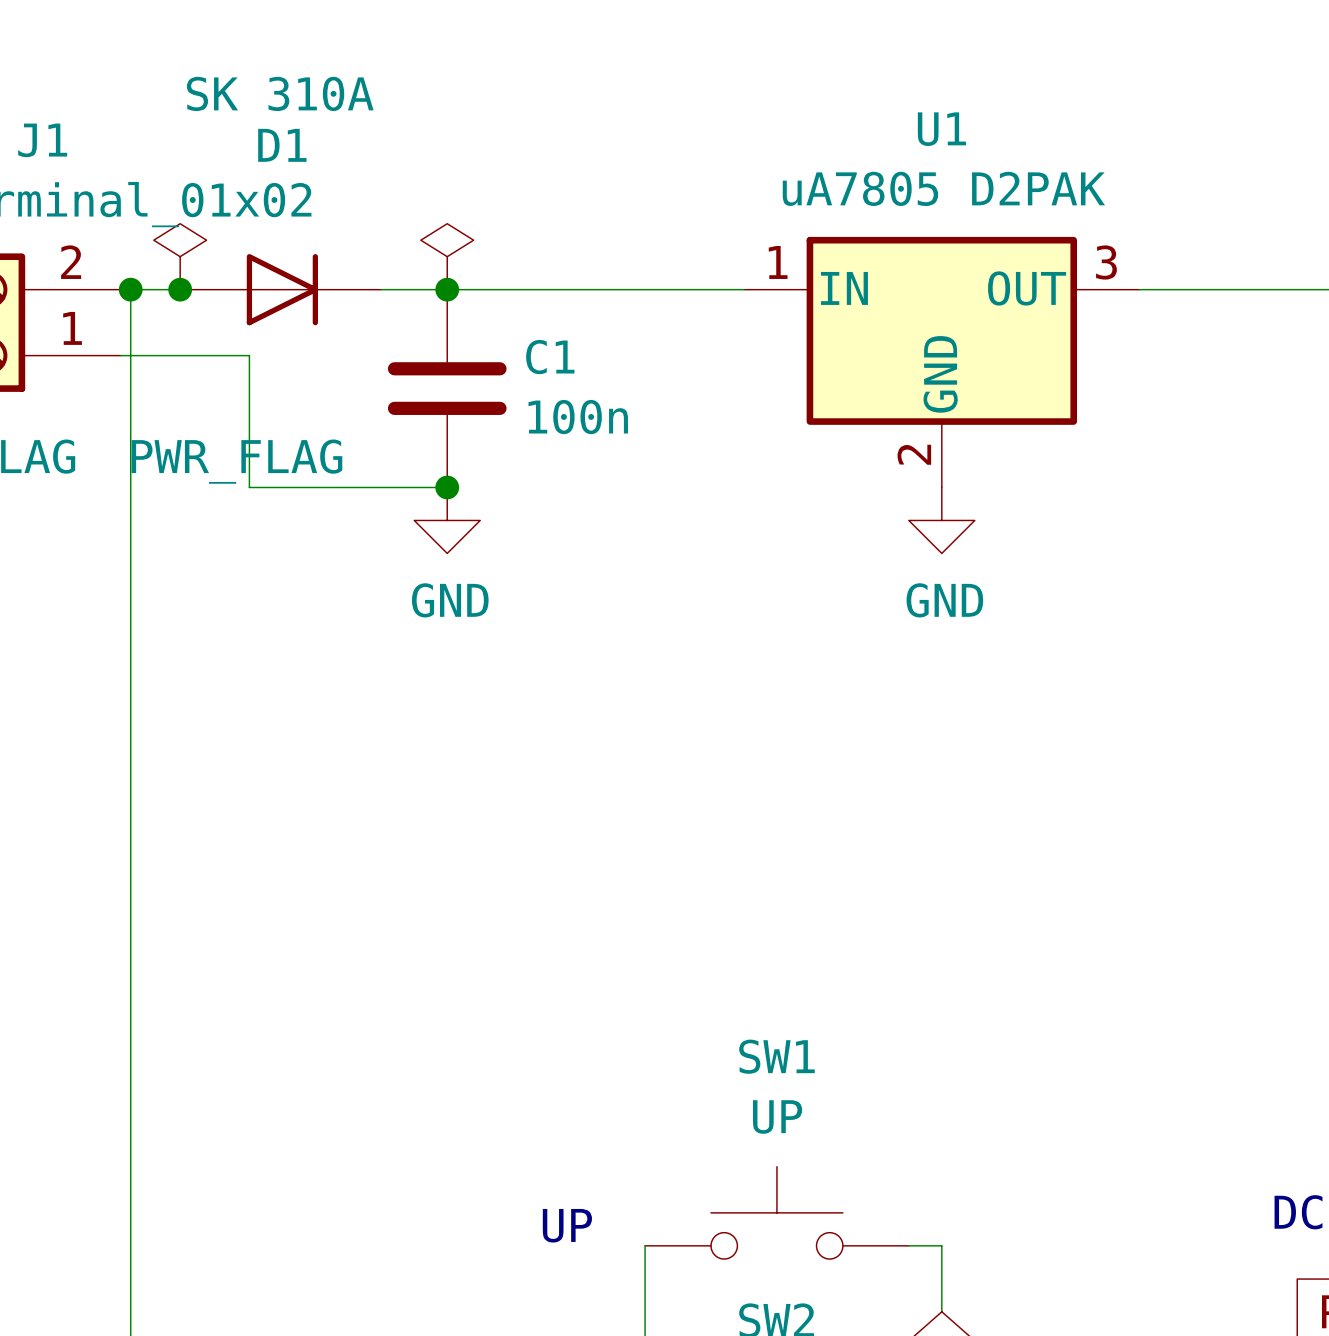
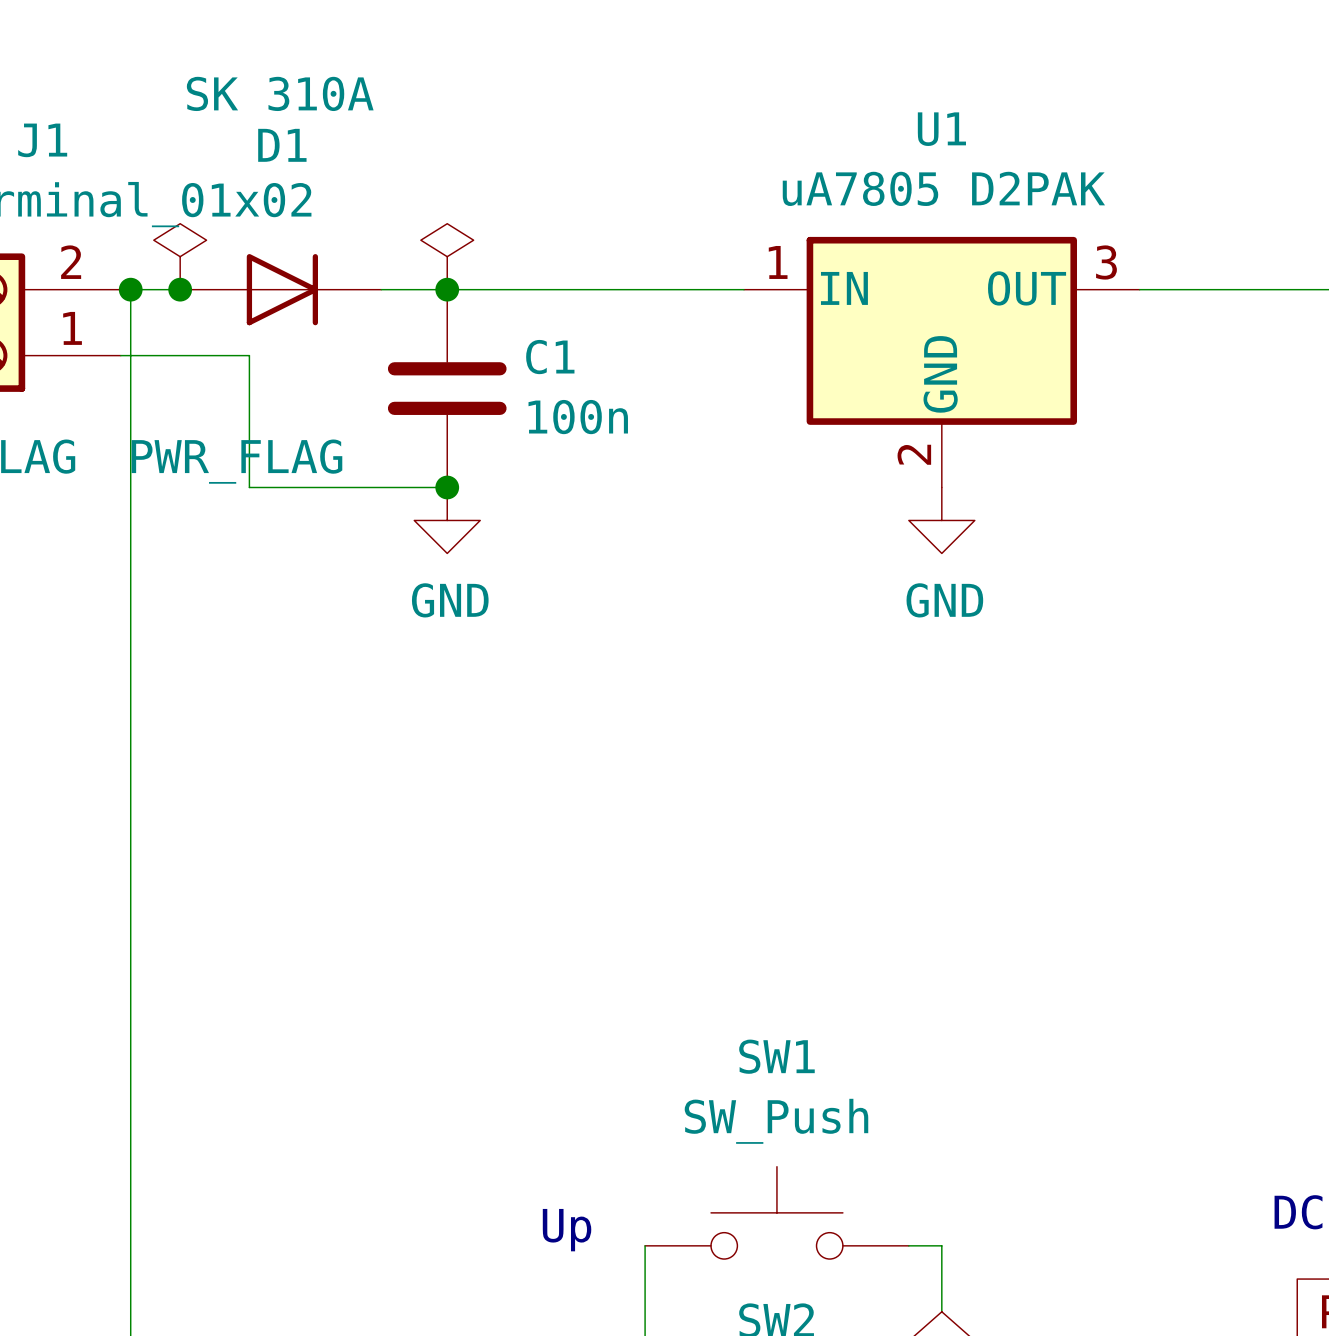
SW1 value: UP (777, 1117) -> SW_Push (776, 1121)
text: UP (567, 1225) -> Up (567, 1230)

